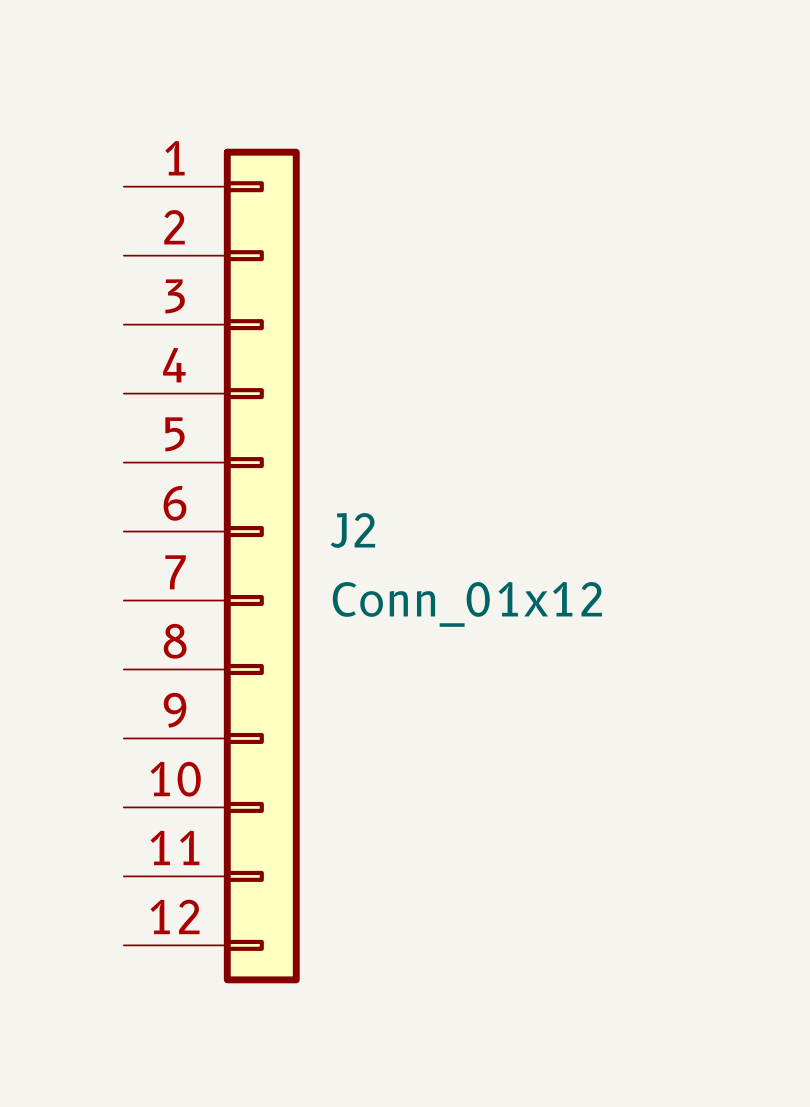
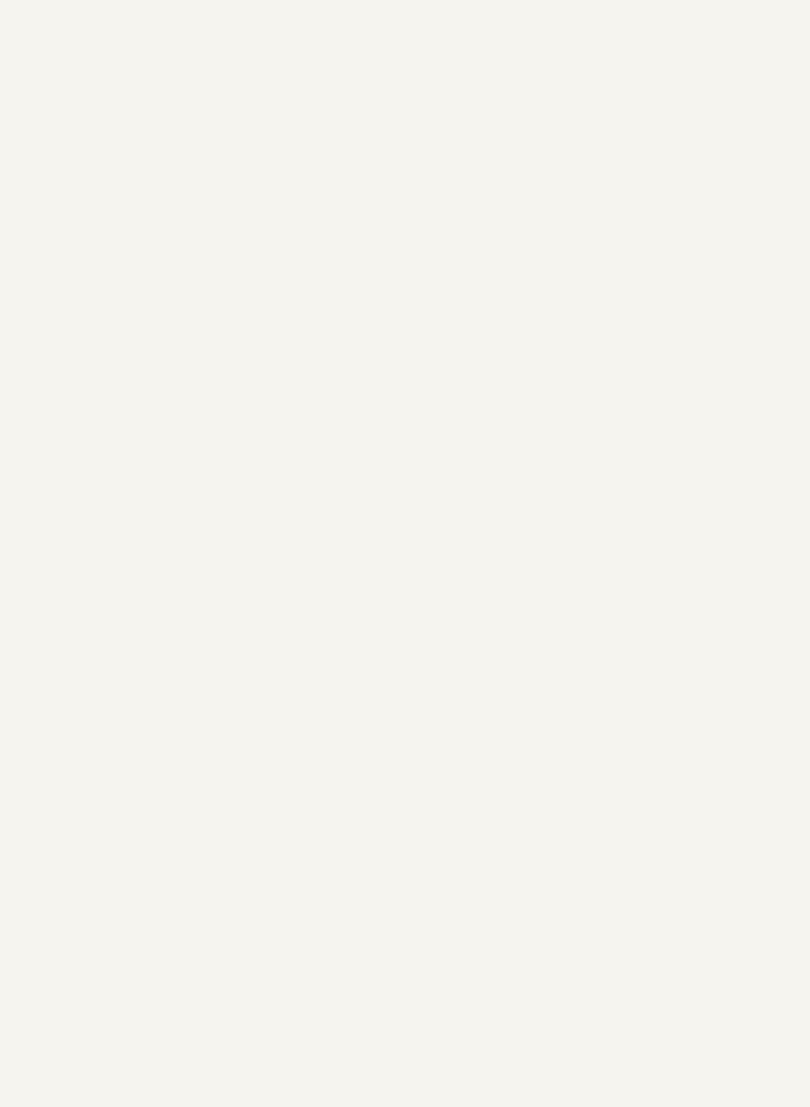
J2: Conn_01x12 (211, 566) -> none

